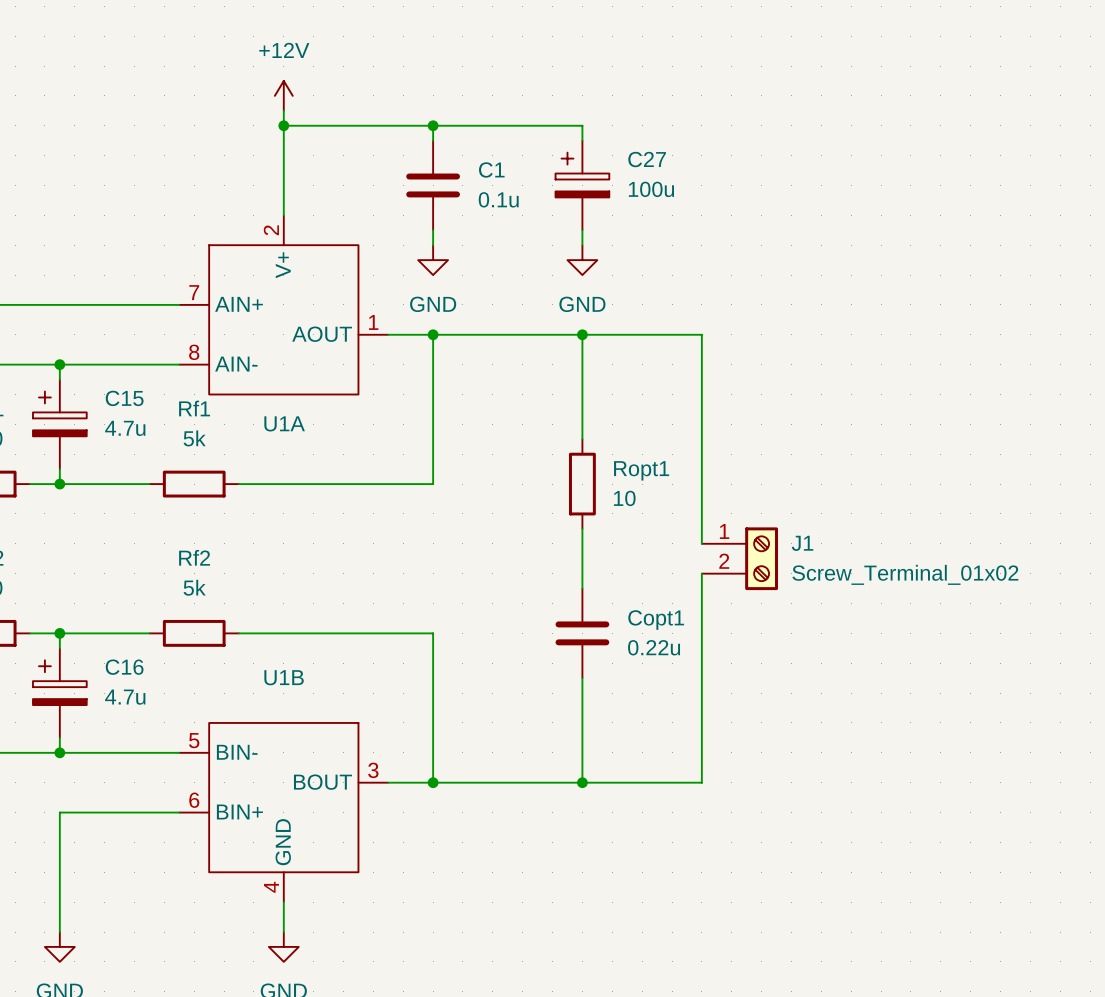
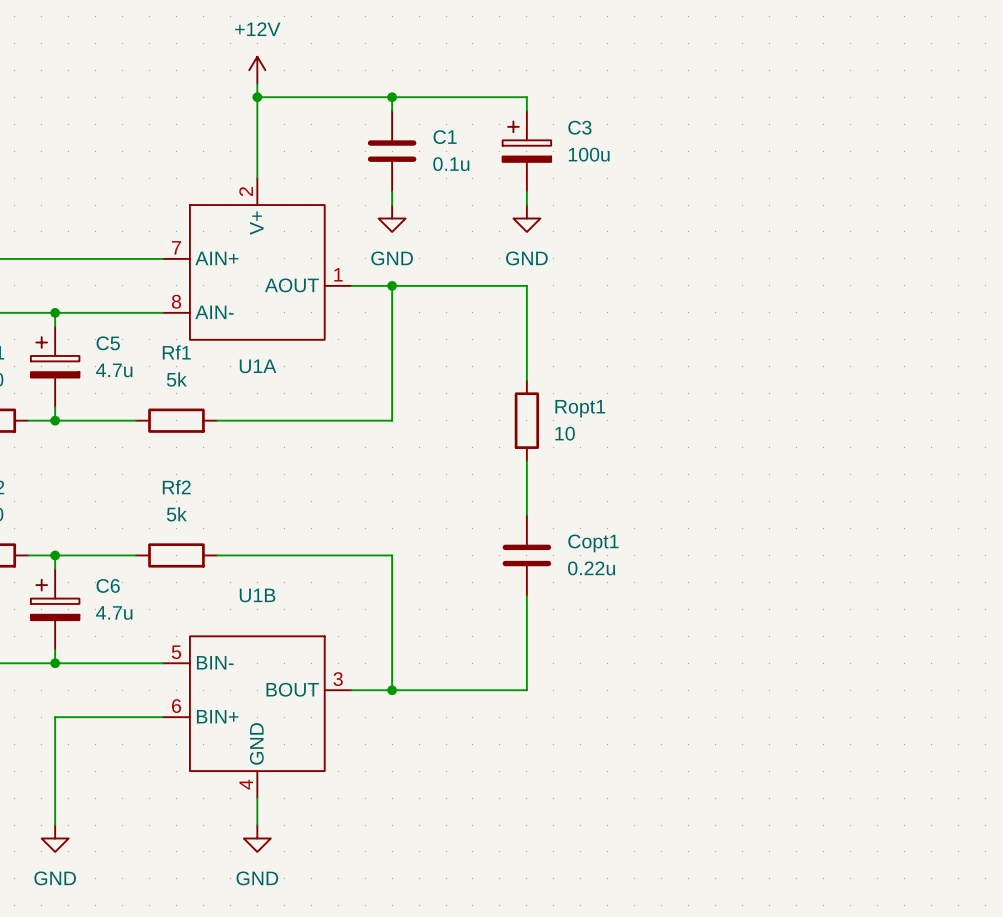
C27 name: C27 (647, 159) -> C3 (579, 127)
wire: (582, 334) (701, 334) (701, 543) -> none
junction: (582, 334) -> none
C15 name: C15 (124, 398) -> C5 (108, 343)
J1: Screw_Terminal_01x02 (739, 558) -> none
wire: (701, 573) (701, 782) (582, 782) -> none
C16 name: C16 (124, 667) -> C6 (108, 585)
junction: (582, 782) -> none

